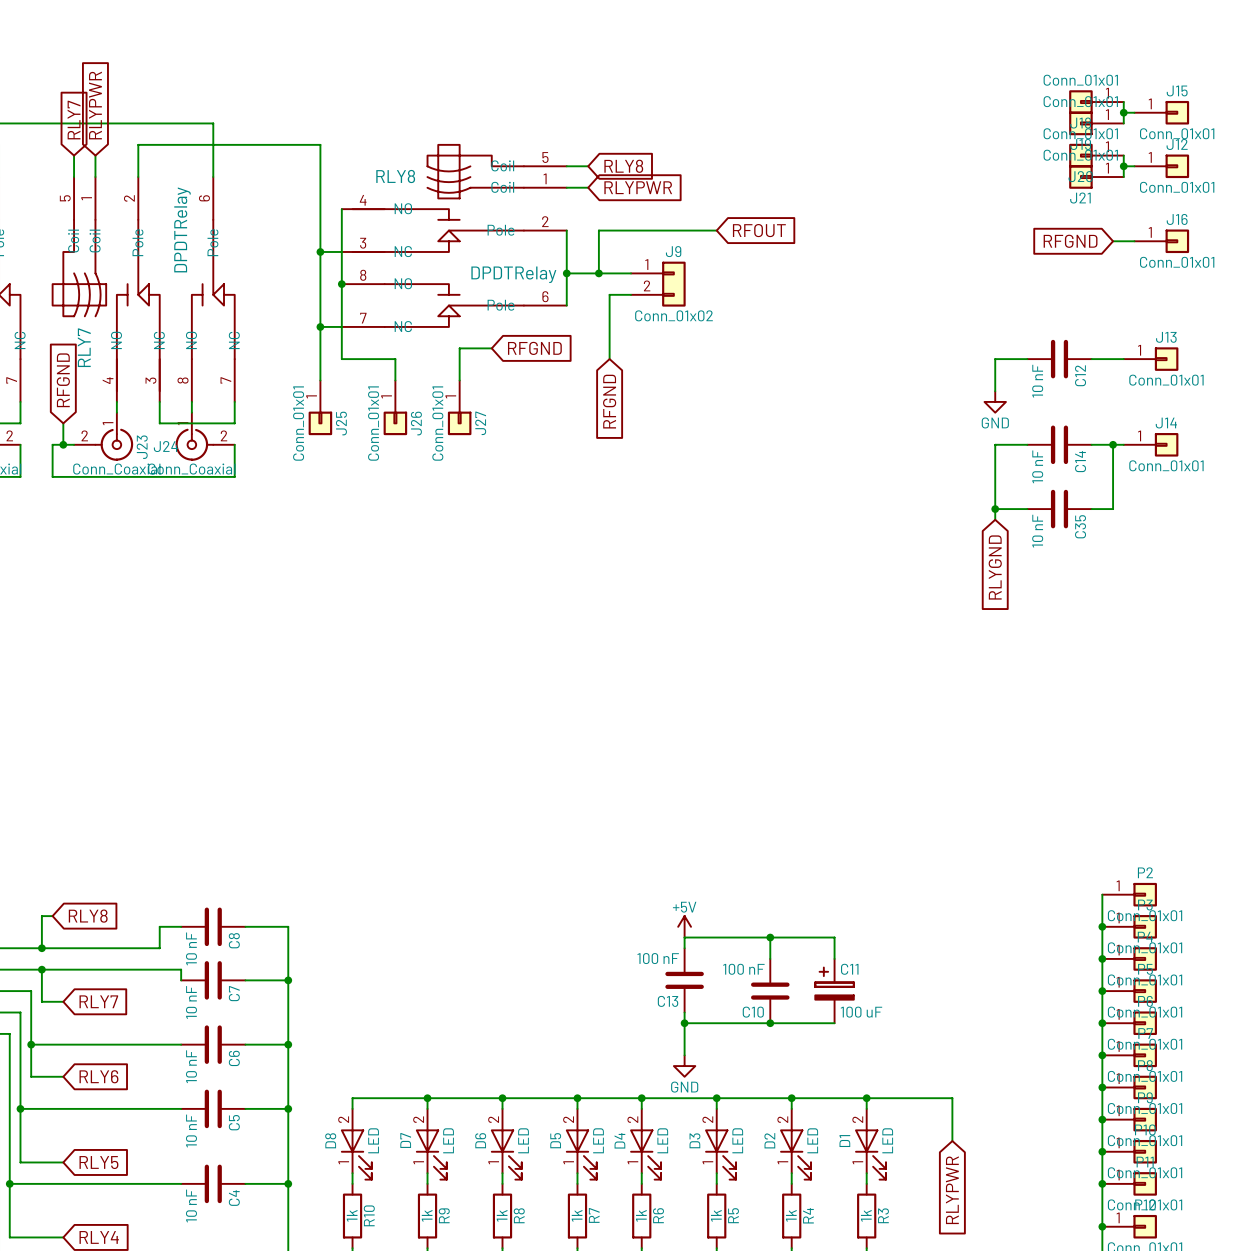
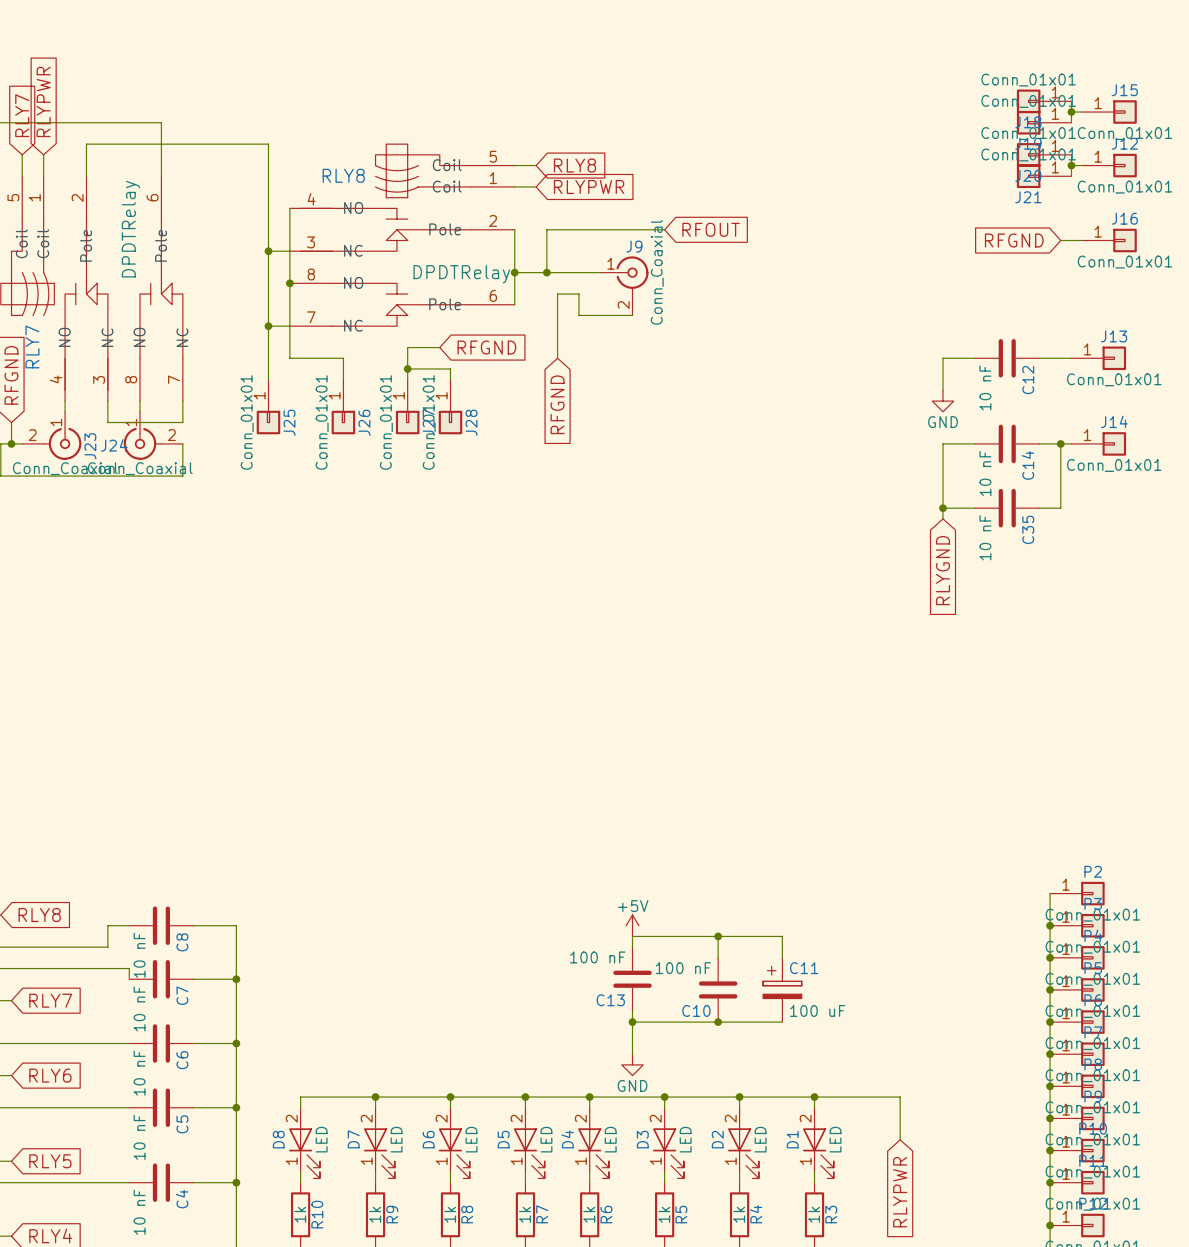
J9 symbol: [631, 261, 686, 307] -> [600, 256, 649, 316]
wire: none -> (578, 294) (578, 315) (632, 315)
J9 value: Conn_01x02 (673, 315) -> Conn_Coaxial (657, 272)
wire: none -> (407, 368) (450, 368) (450, 379)
junction: none -> (407, 368)
J28: none -> Conn_01x01 (450, 406)

